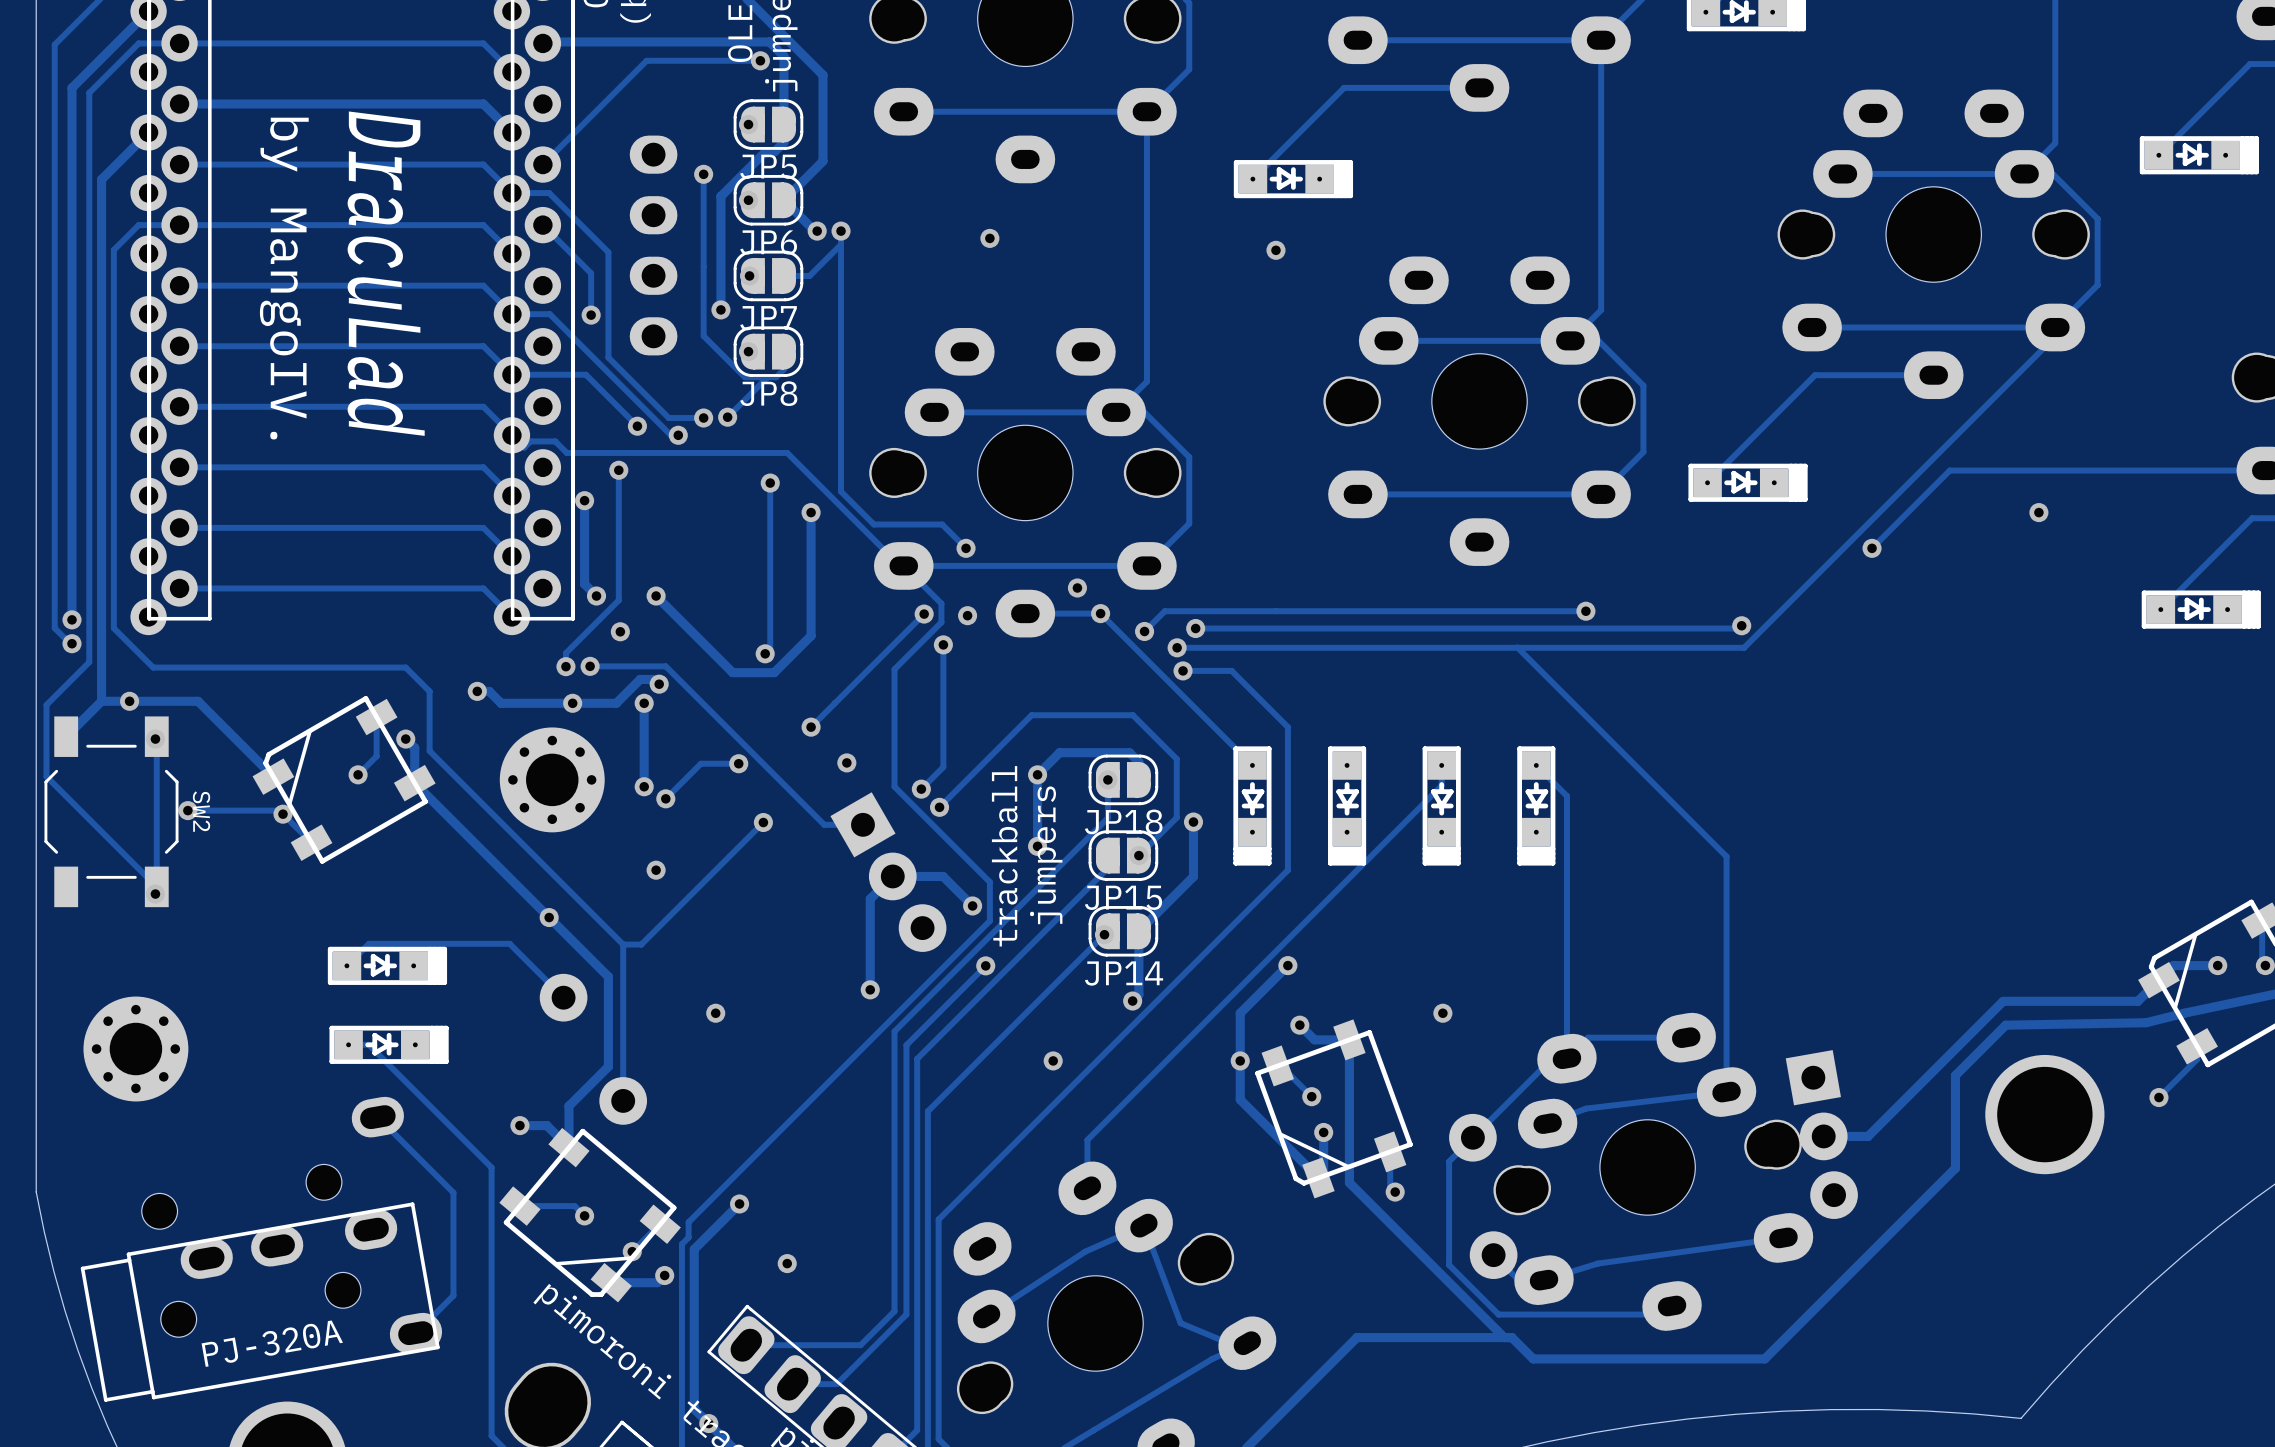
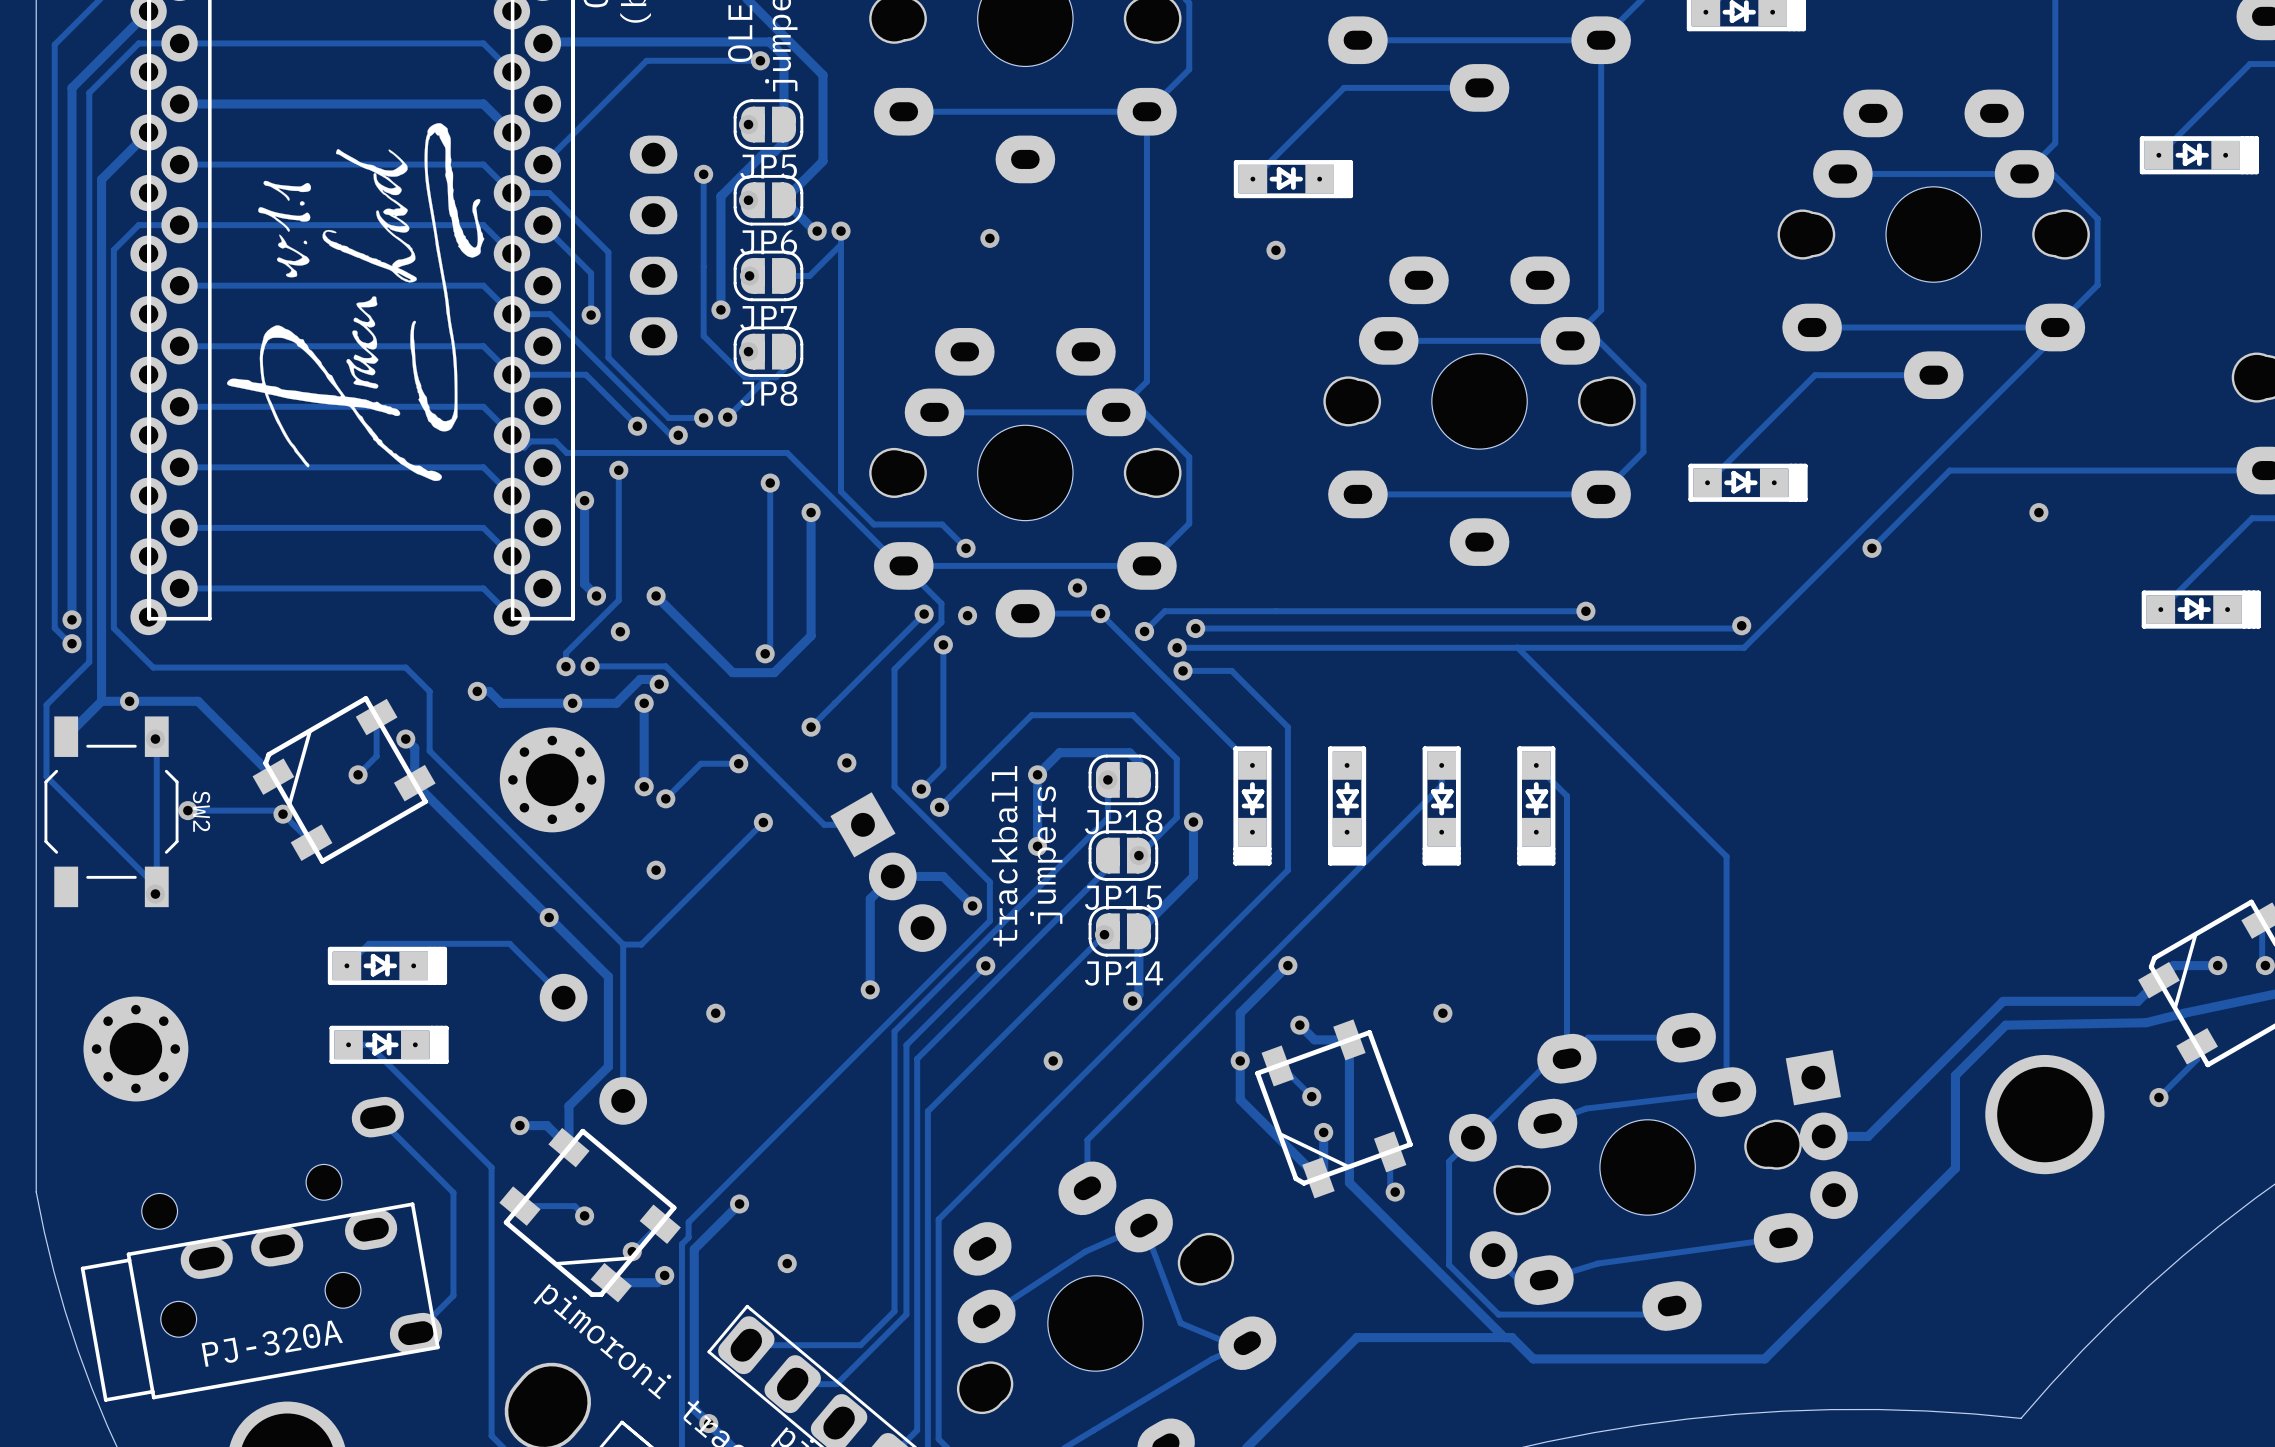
drawing: none -> [226, 123, 485, 482]
text: DracuLad (386, 273) -> none
text: by MangoIV. (284, 278) -> none

